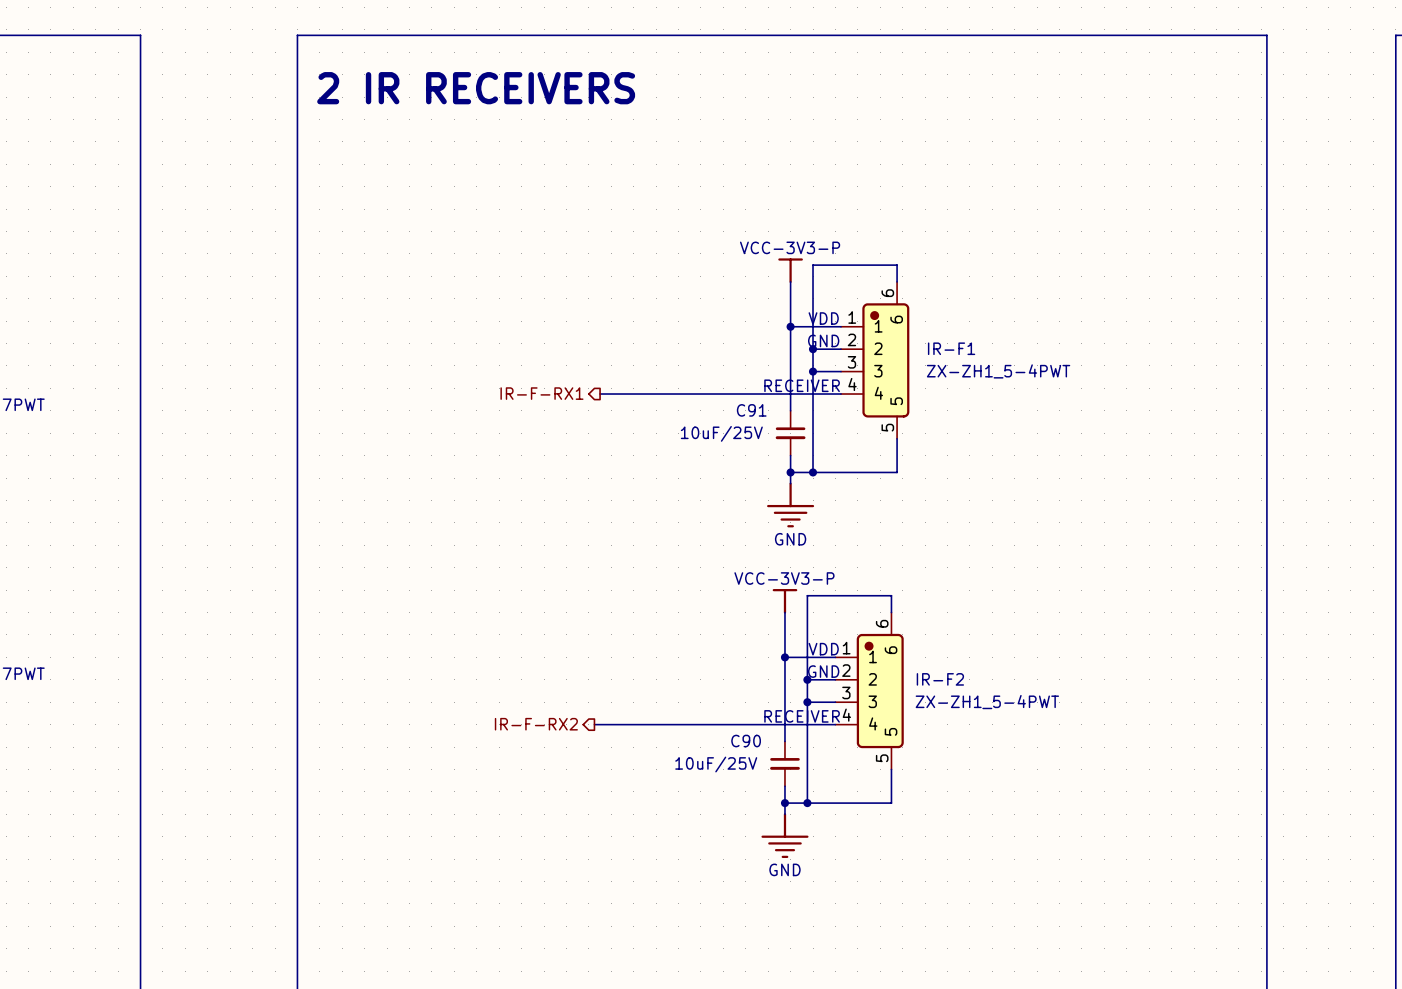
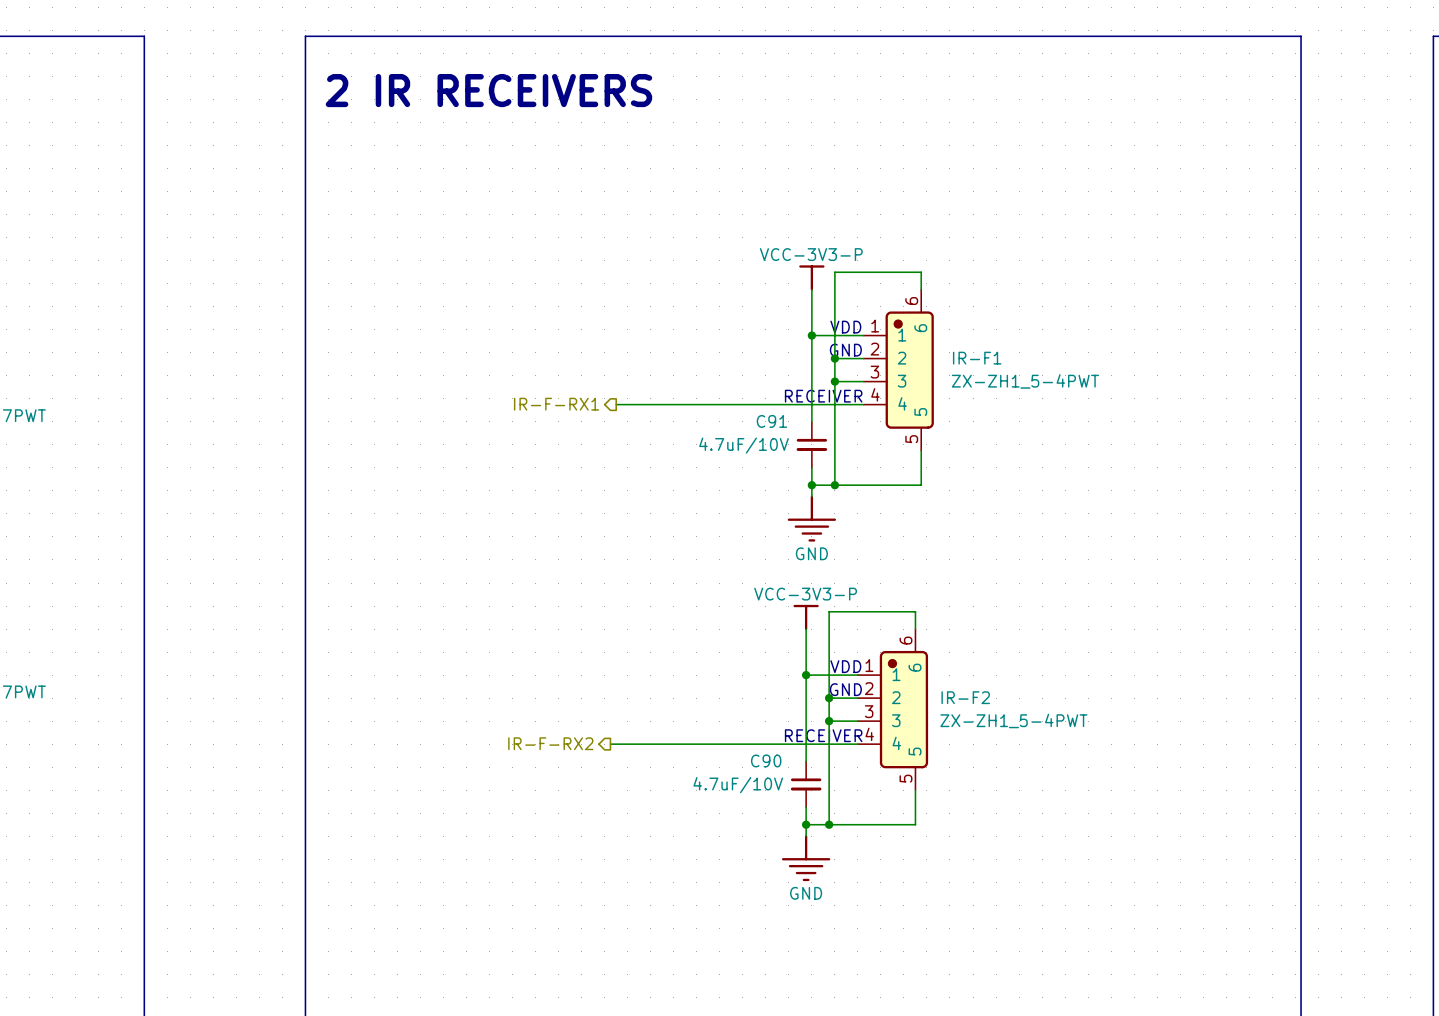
C91 value: 10uF/25V (721, 433) -> 4.7uF/10V (744, 445)
C90 value: 10uF/25V (716, 764) -> 4.7uF/10V (738, 785)

